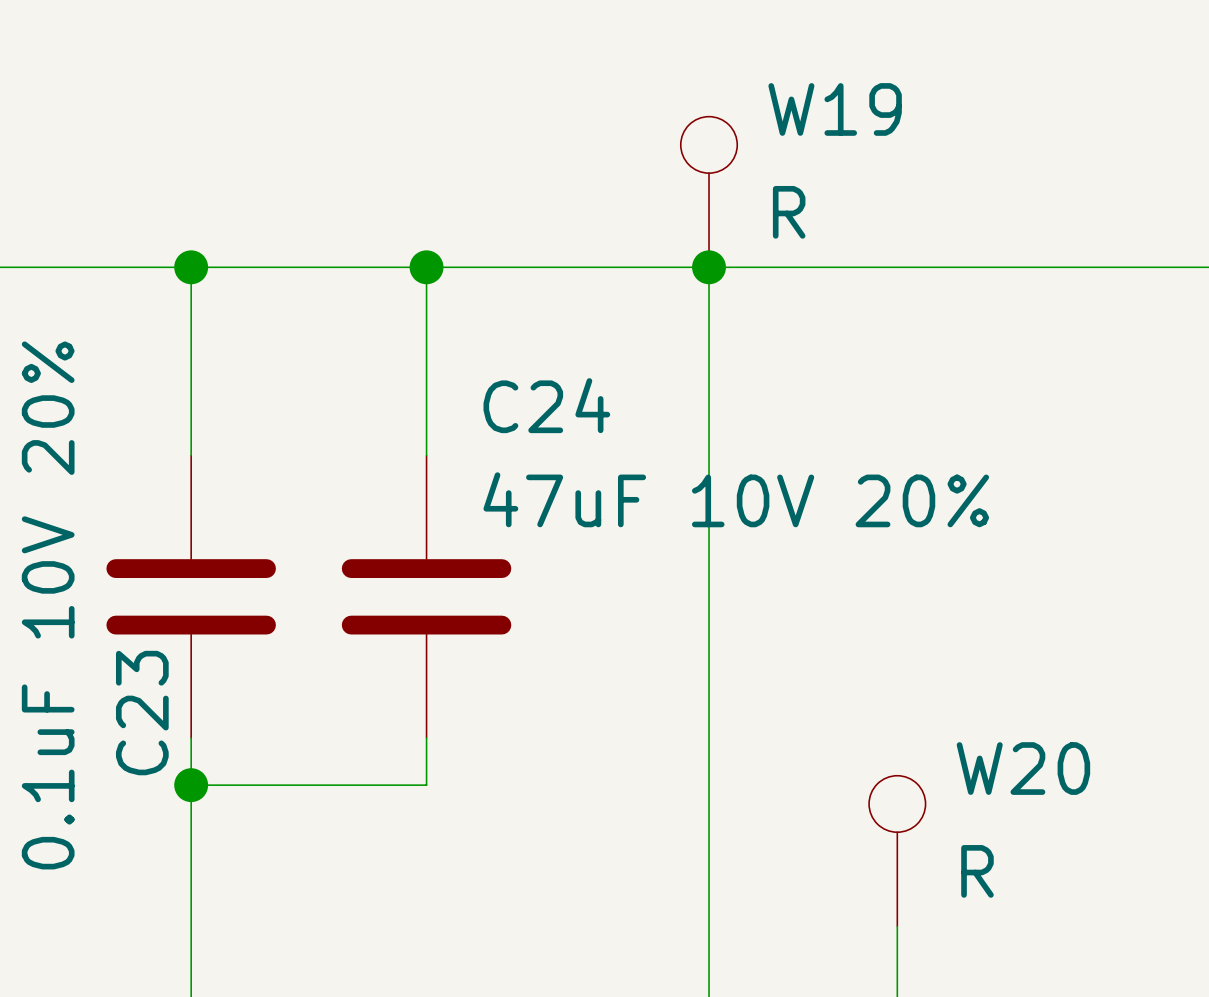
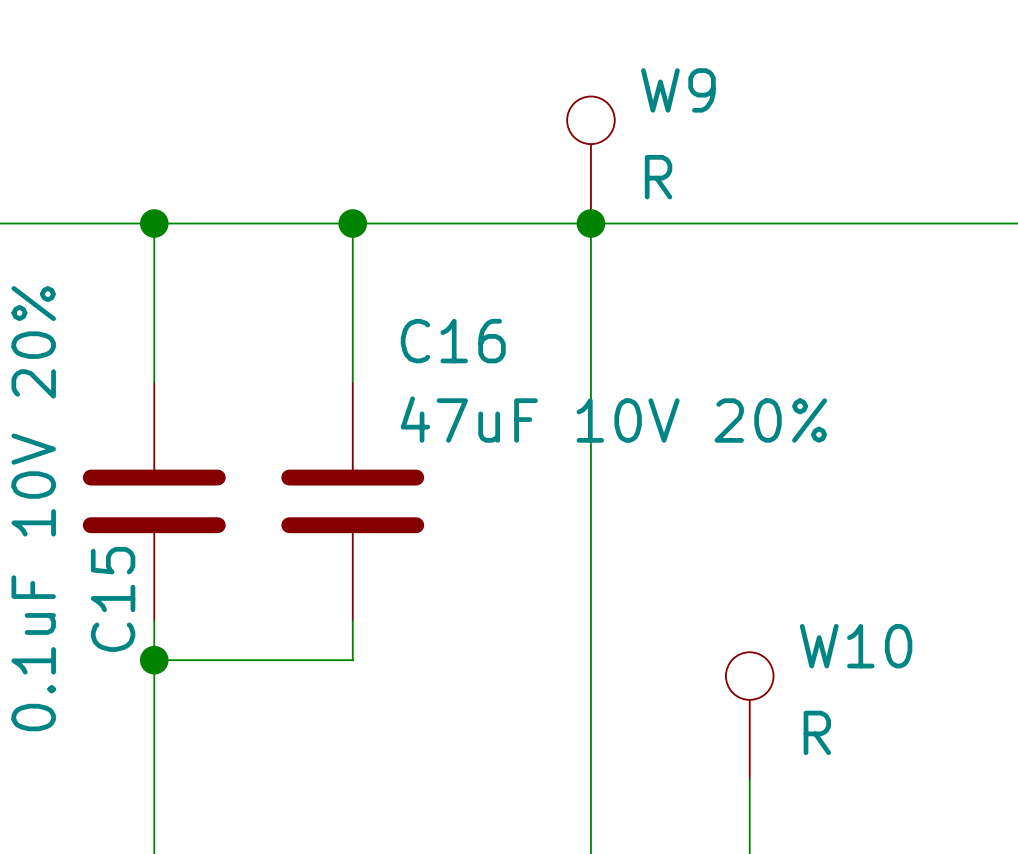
W19 name: W19 (835, 109) -> W9 (678, 90)
C24 name: C24 (546, 405) -> C16 (453, 341)
C23 name: C23 (142, 713) -> C15 (113, 599)
W20 name: W20 (1023, 768) -> W10 (856, 646)

